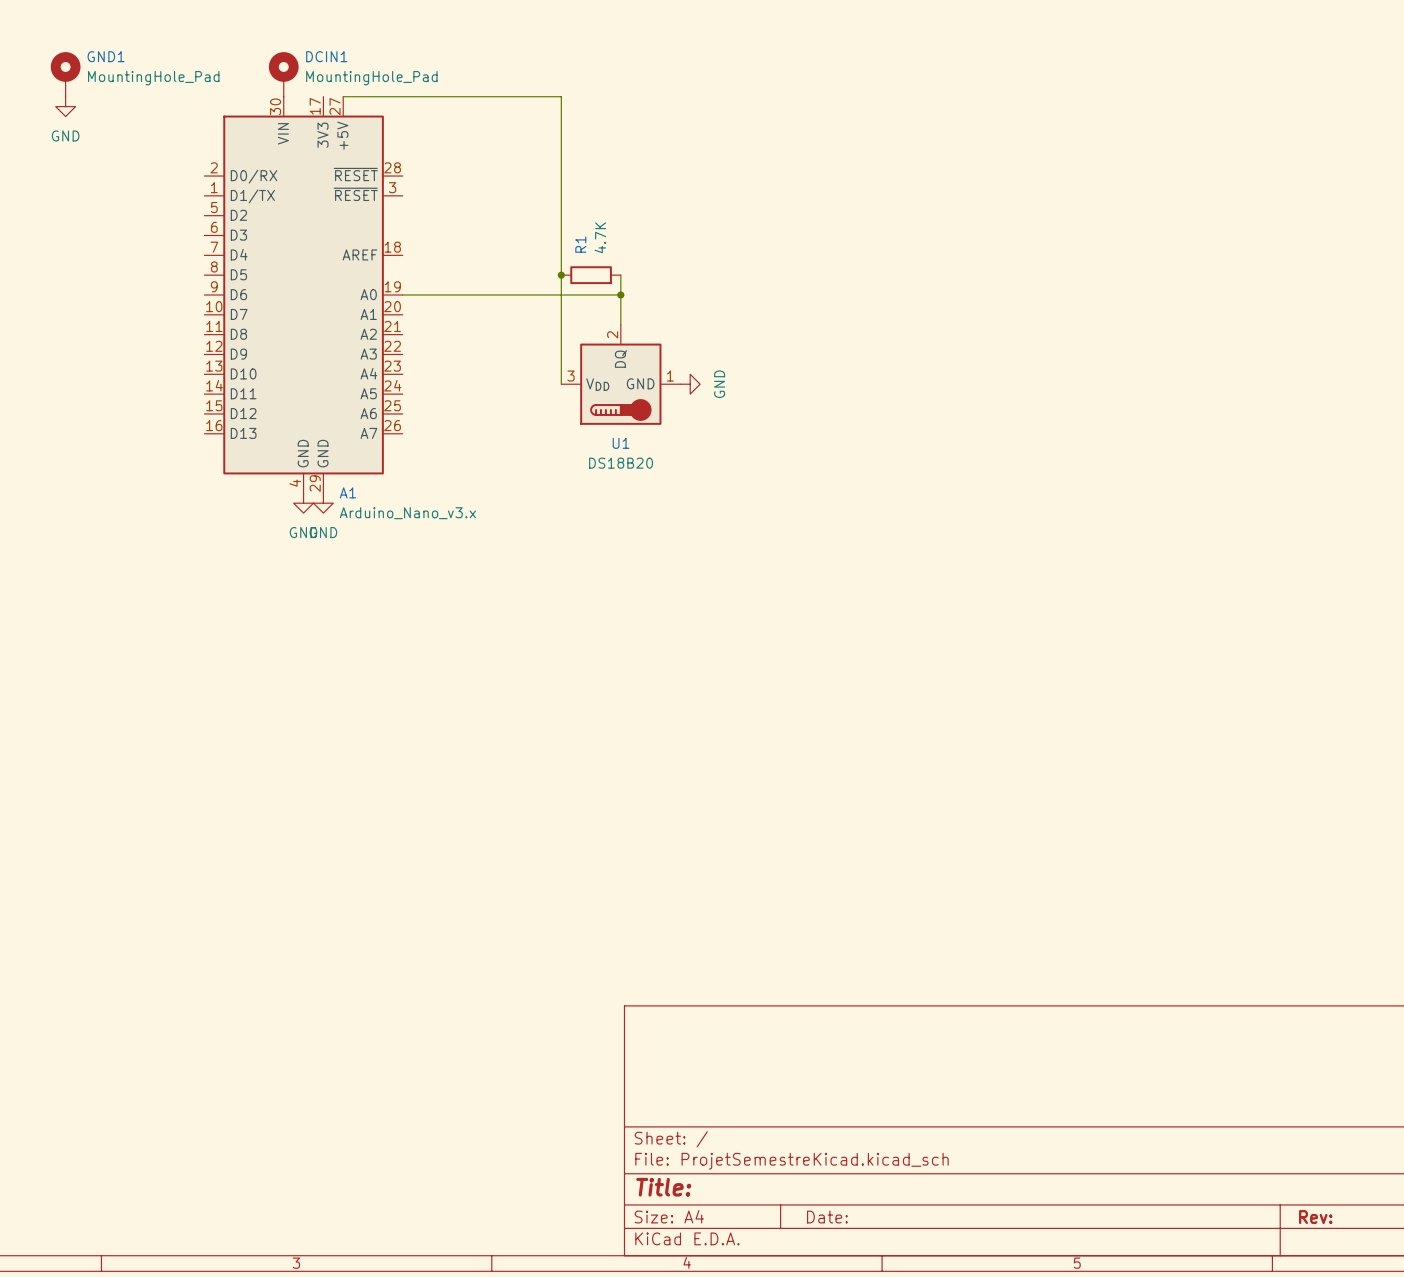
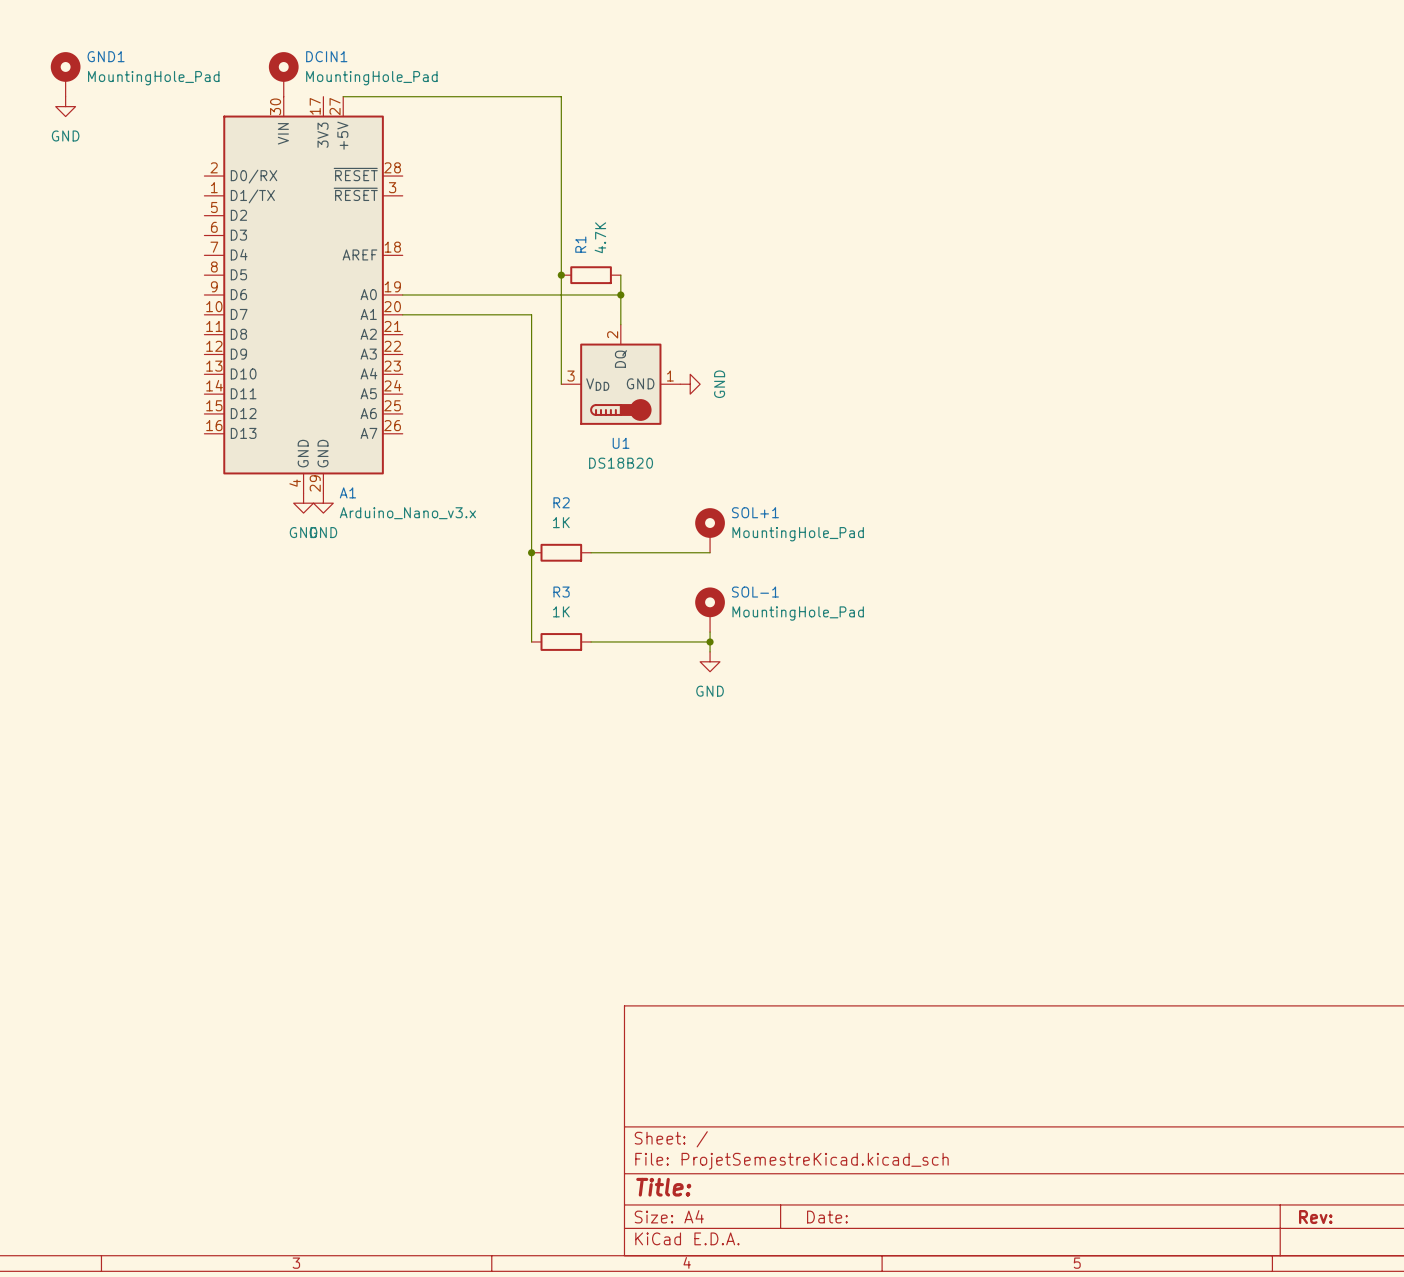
wire: none -> (402, 314) (531, 314) (531, 641)
SOL+1: none -> MountingHole_Pad (710, 530)
junction: none -> (531, 552)
R2: none -> 1K (561, 552)
wire: none -> (591, 552) (710, 552)
SOL-1: none -> MountingHole_Pad (710, 609)
wire: none -> (710, 632) (710, 651)
R3: none -> 1K (561, 641)
wire: none -> (591, 641) (710, 641)
junction: none -> (710, 641)
power symbol: none -> GND (710, 661)

